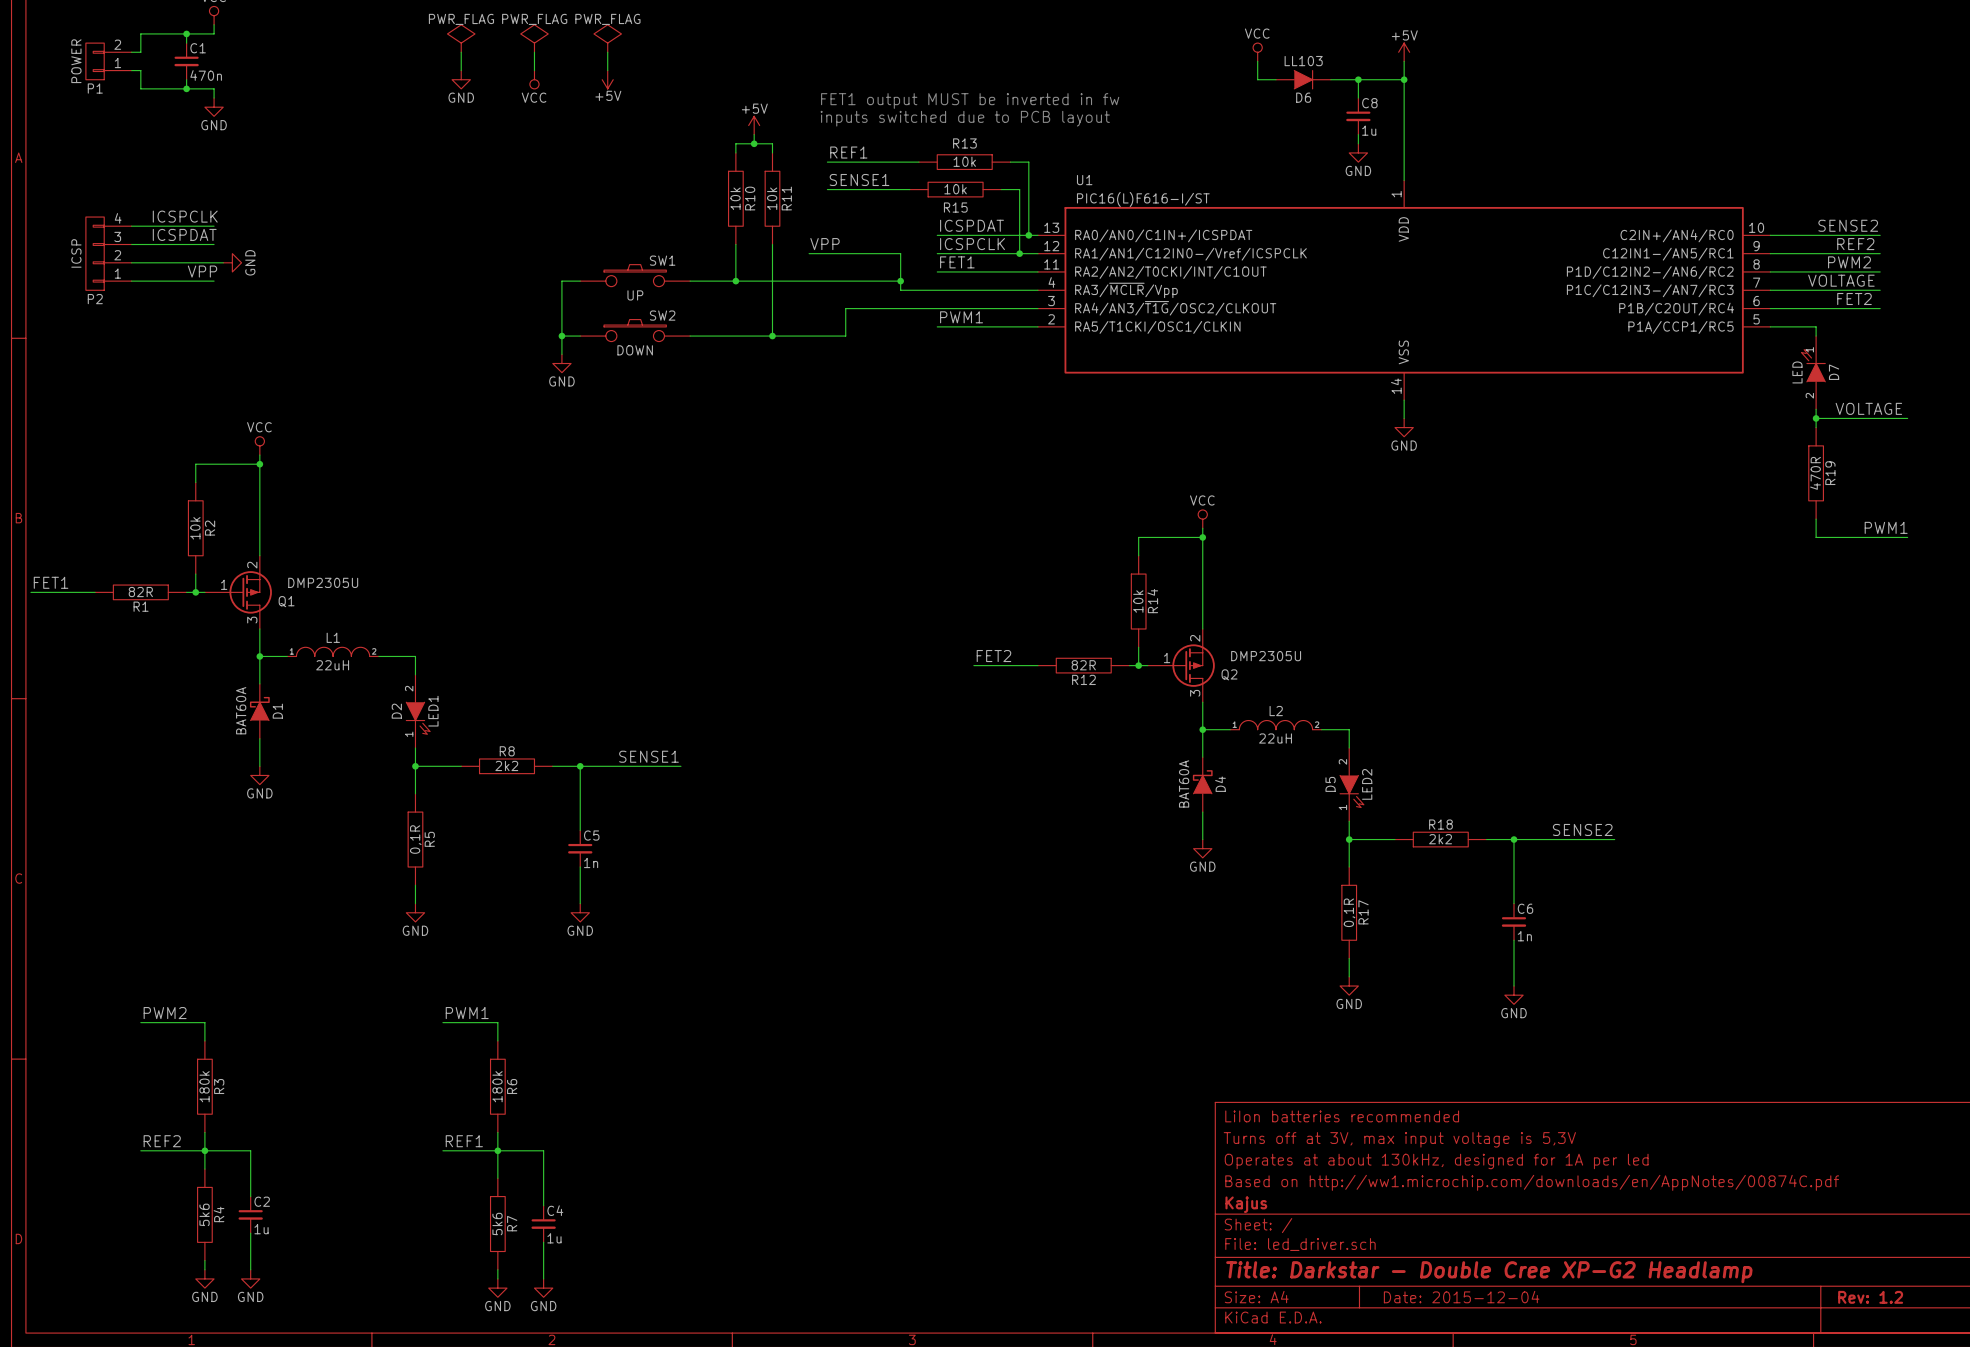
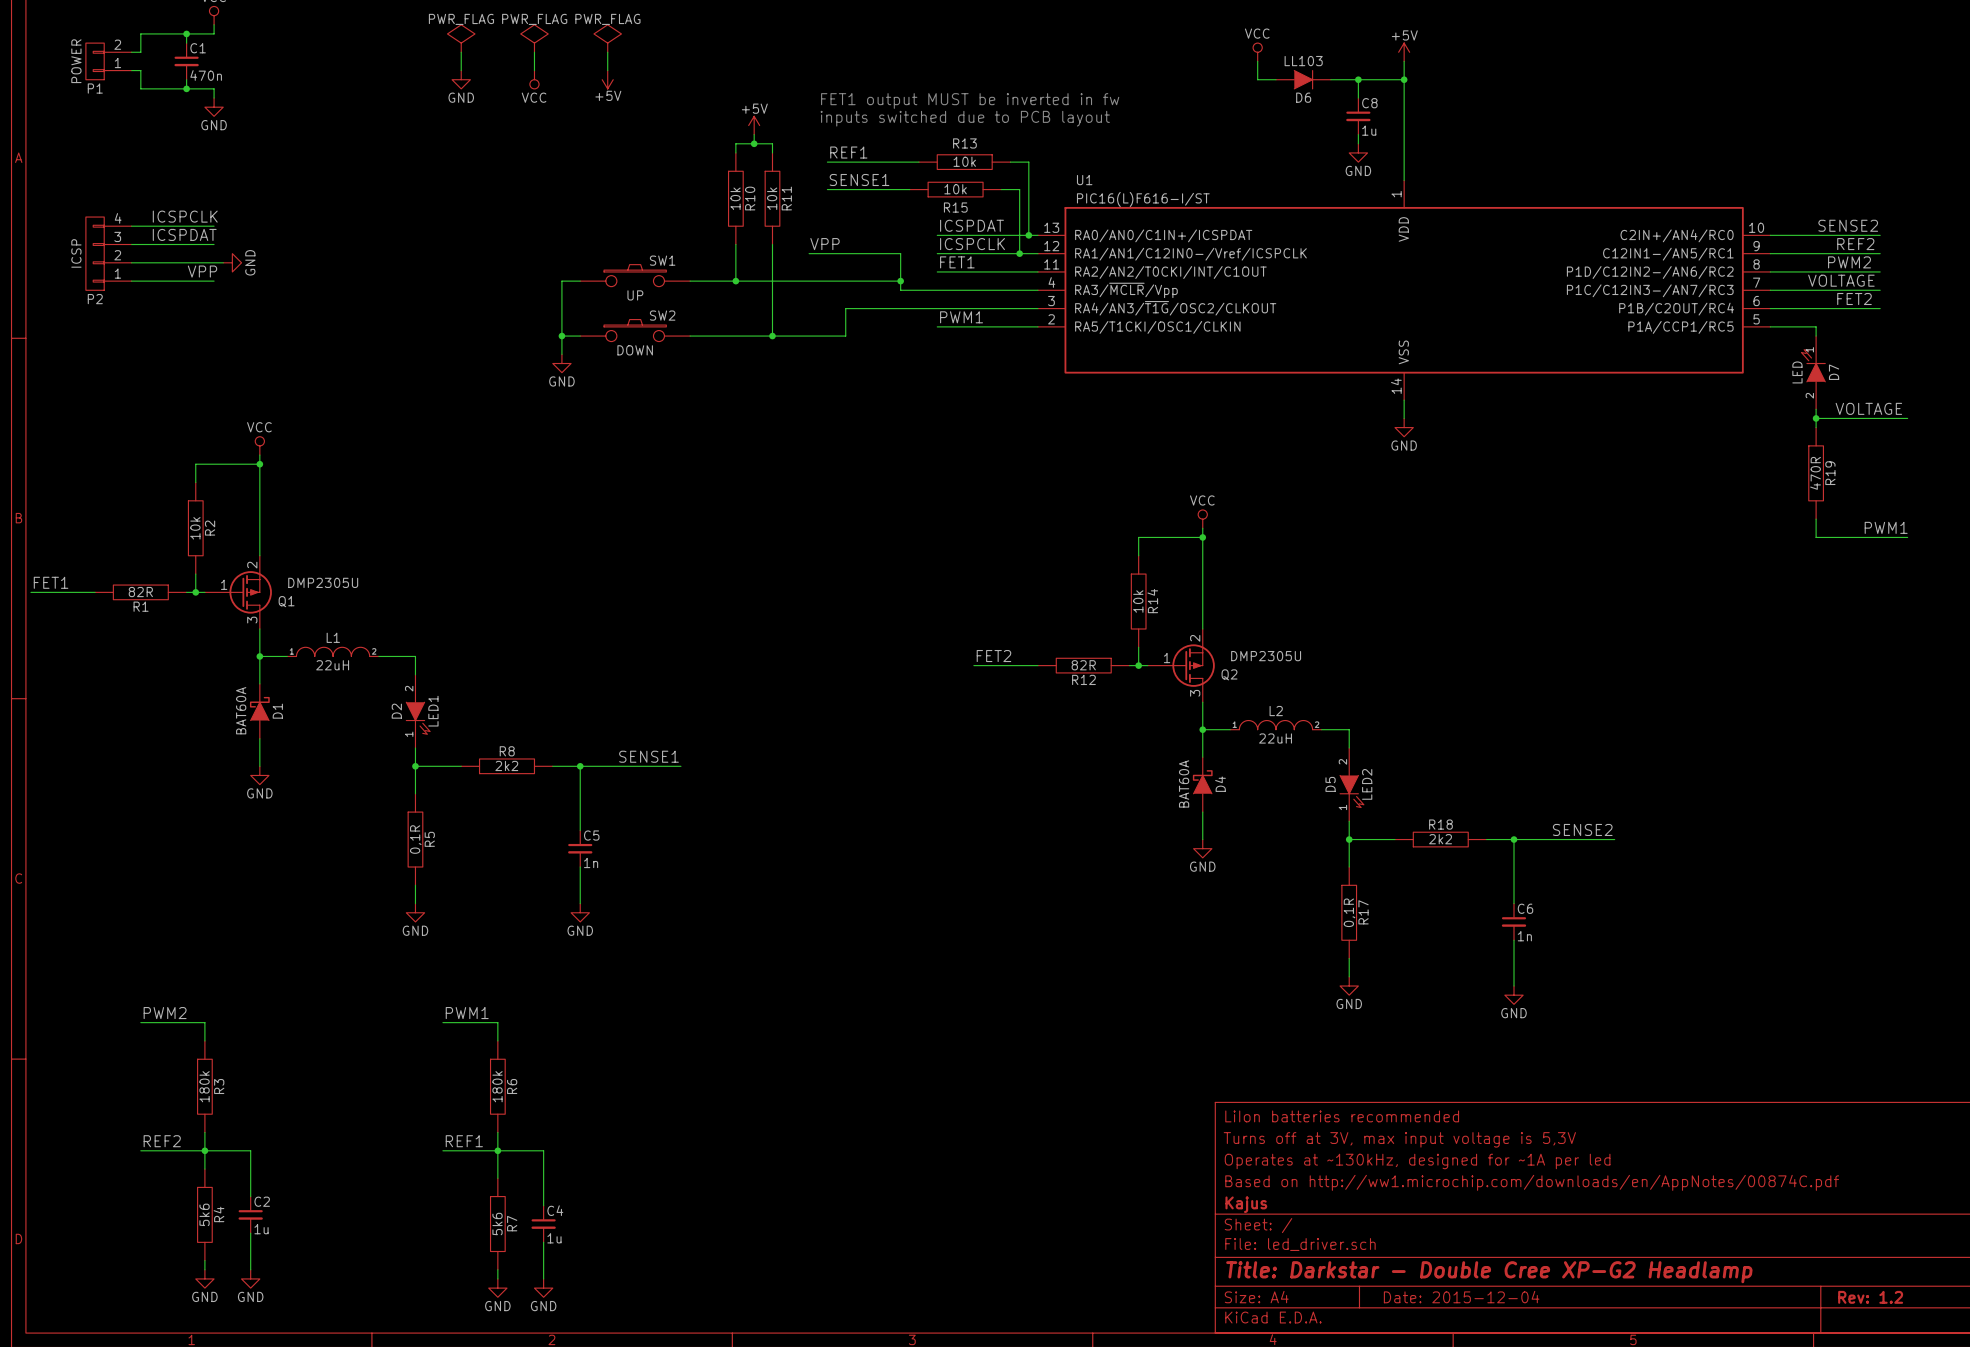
title block: Operates at about 130kHz, designed for 1A per led (1436, 1161) -> Operates at ~130kHz, designed for ~1A per led (1417, 1161)

